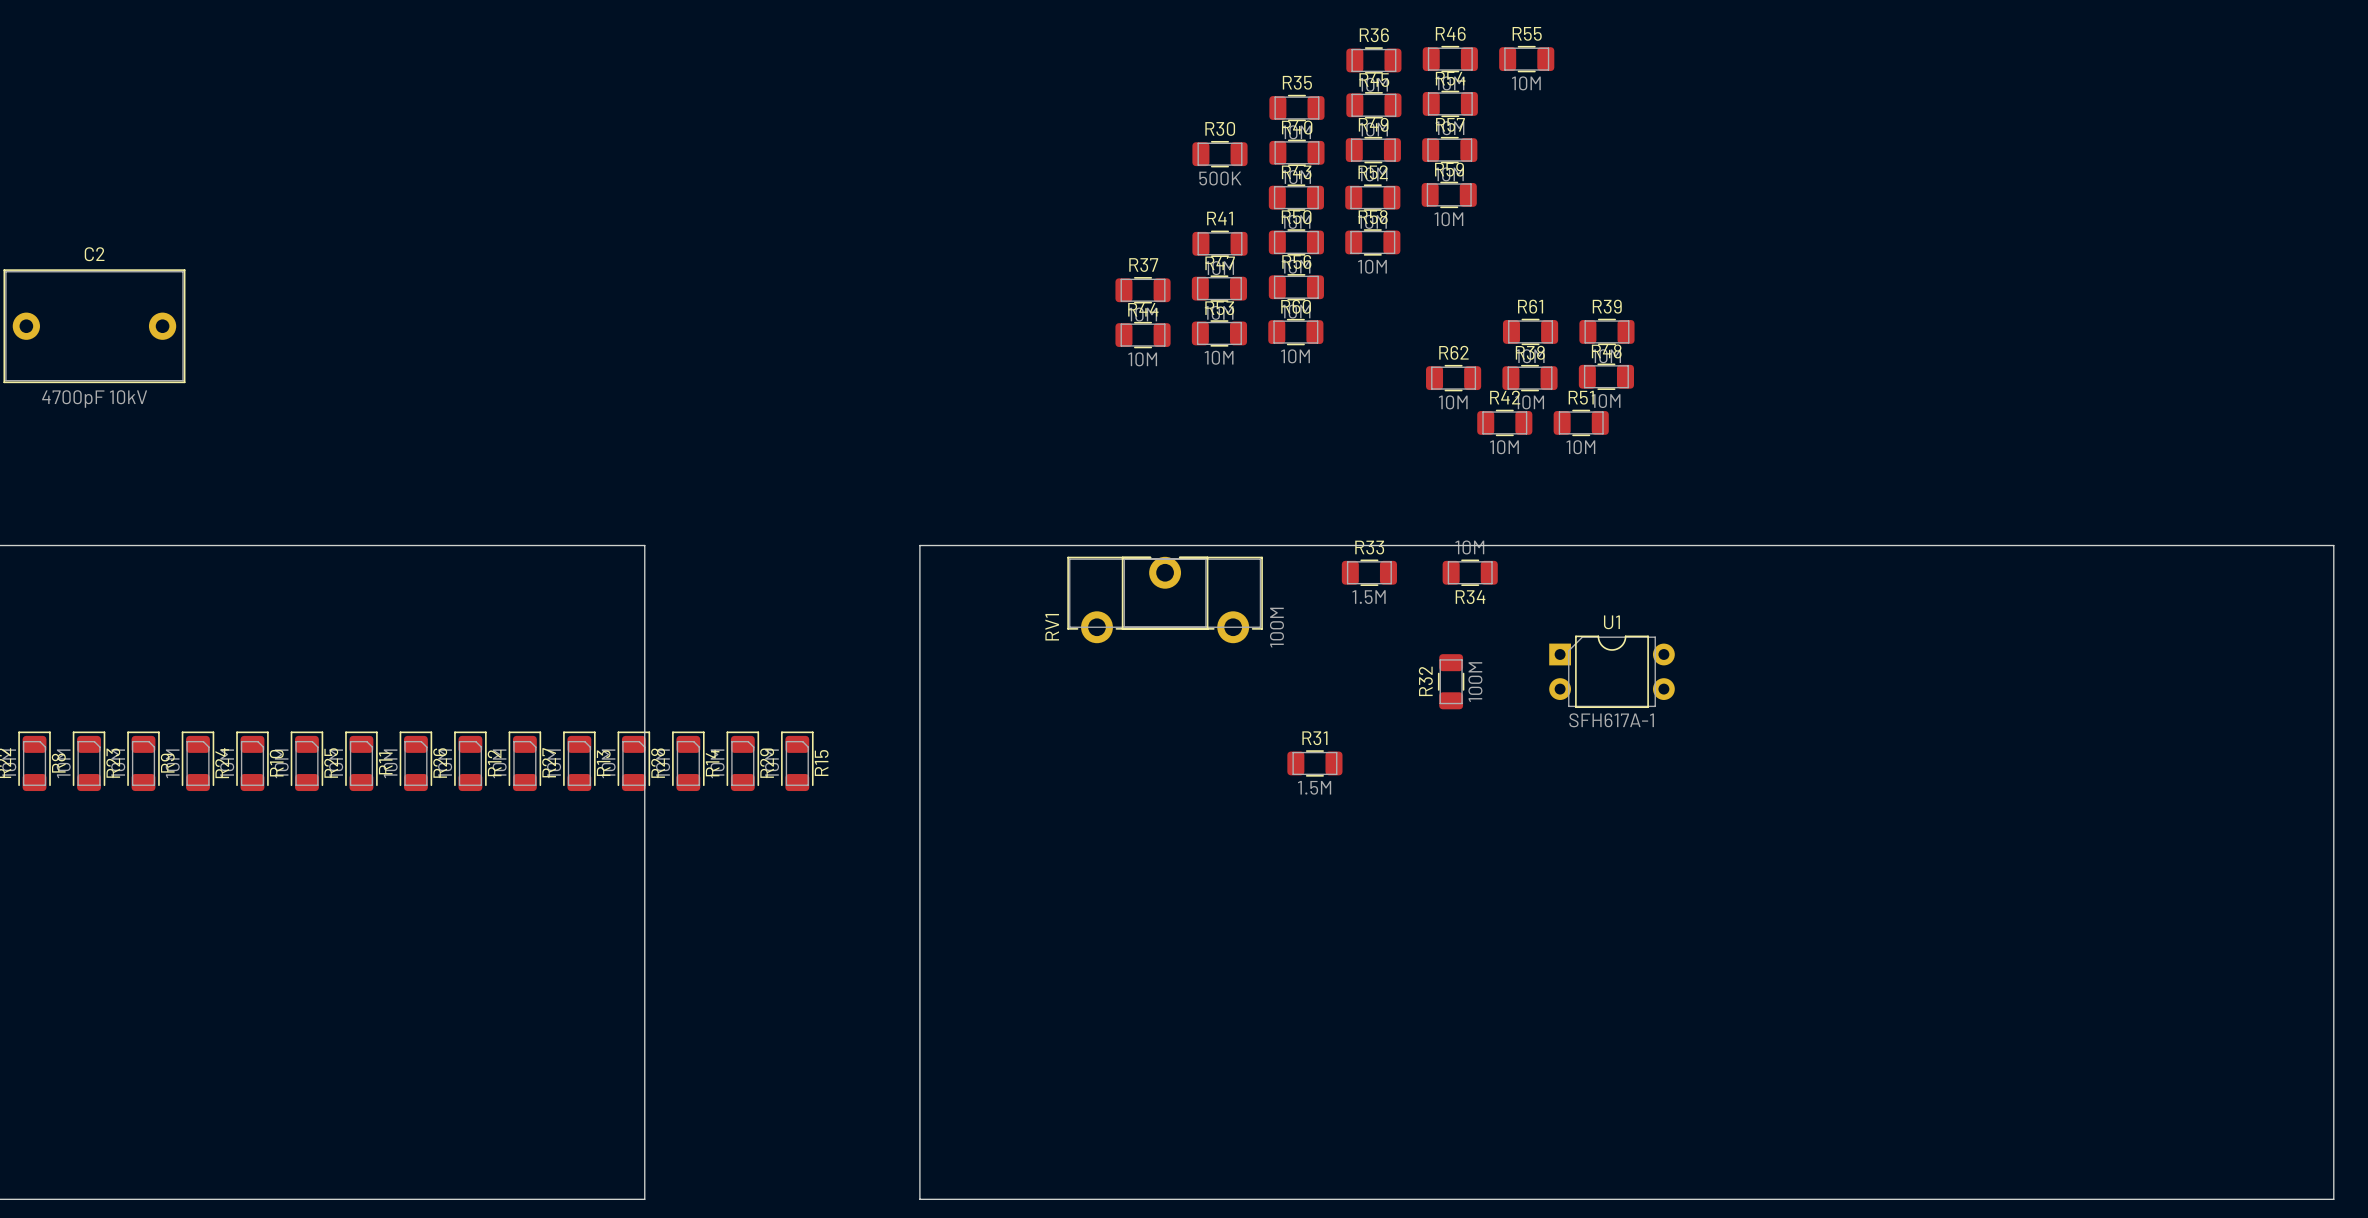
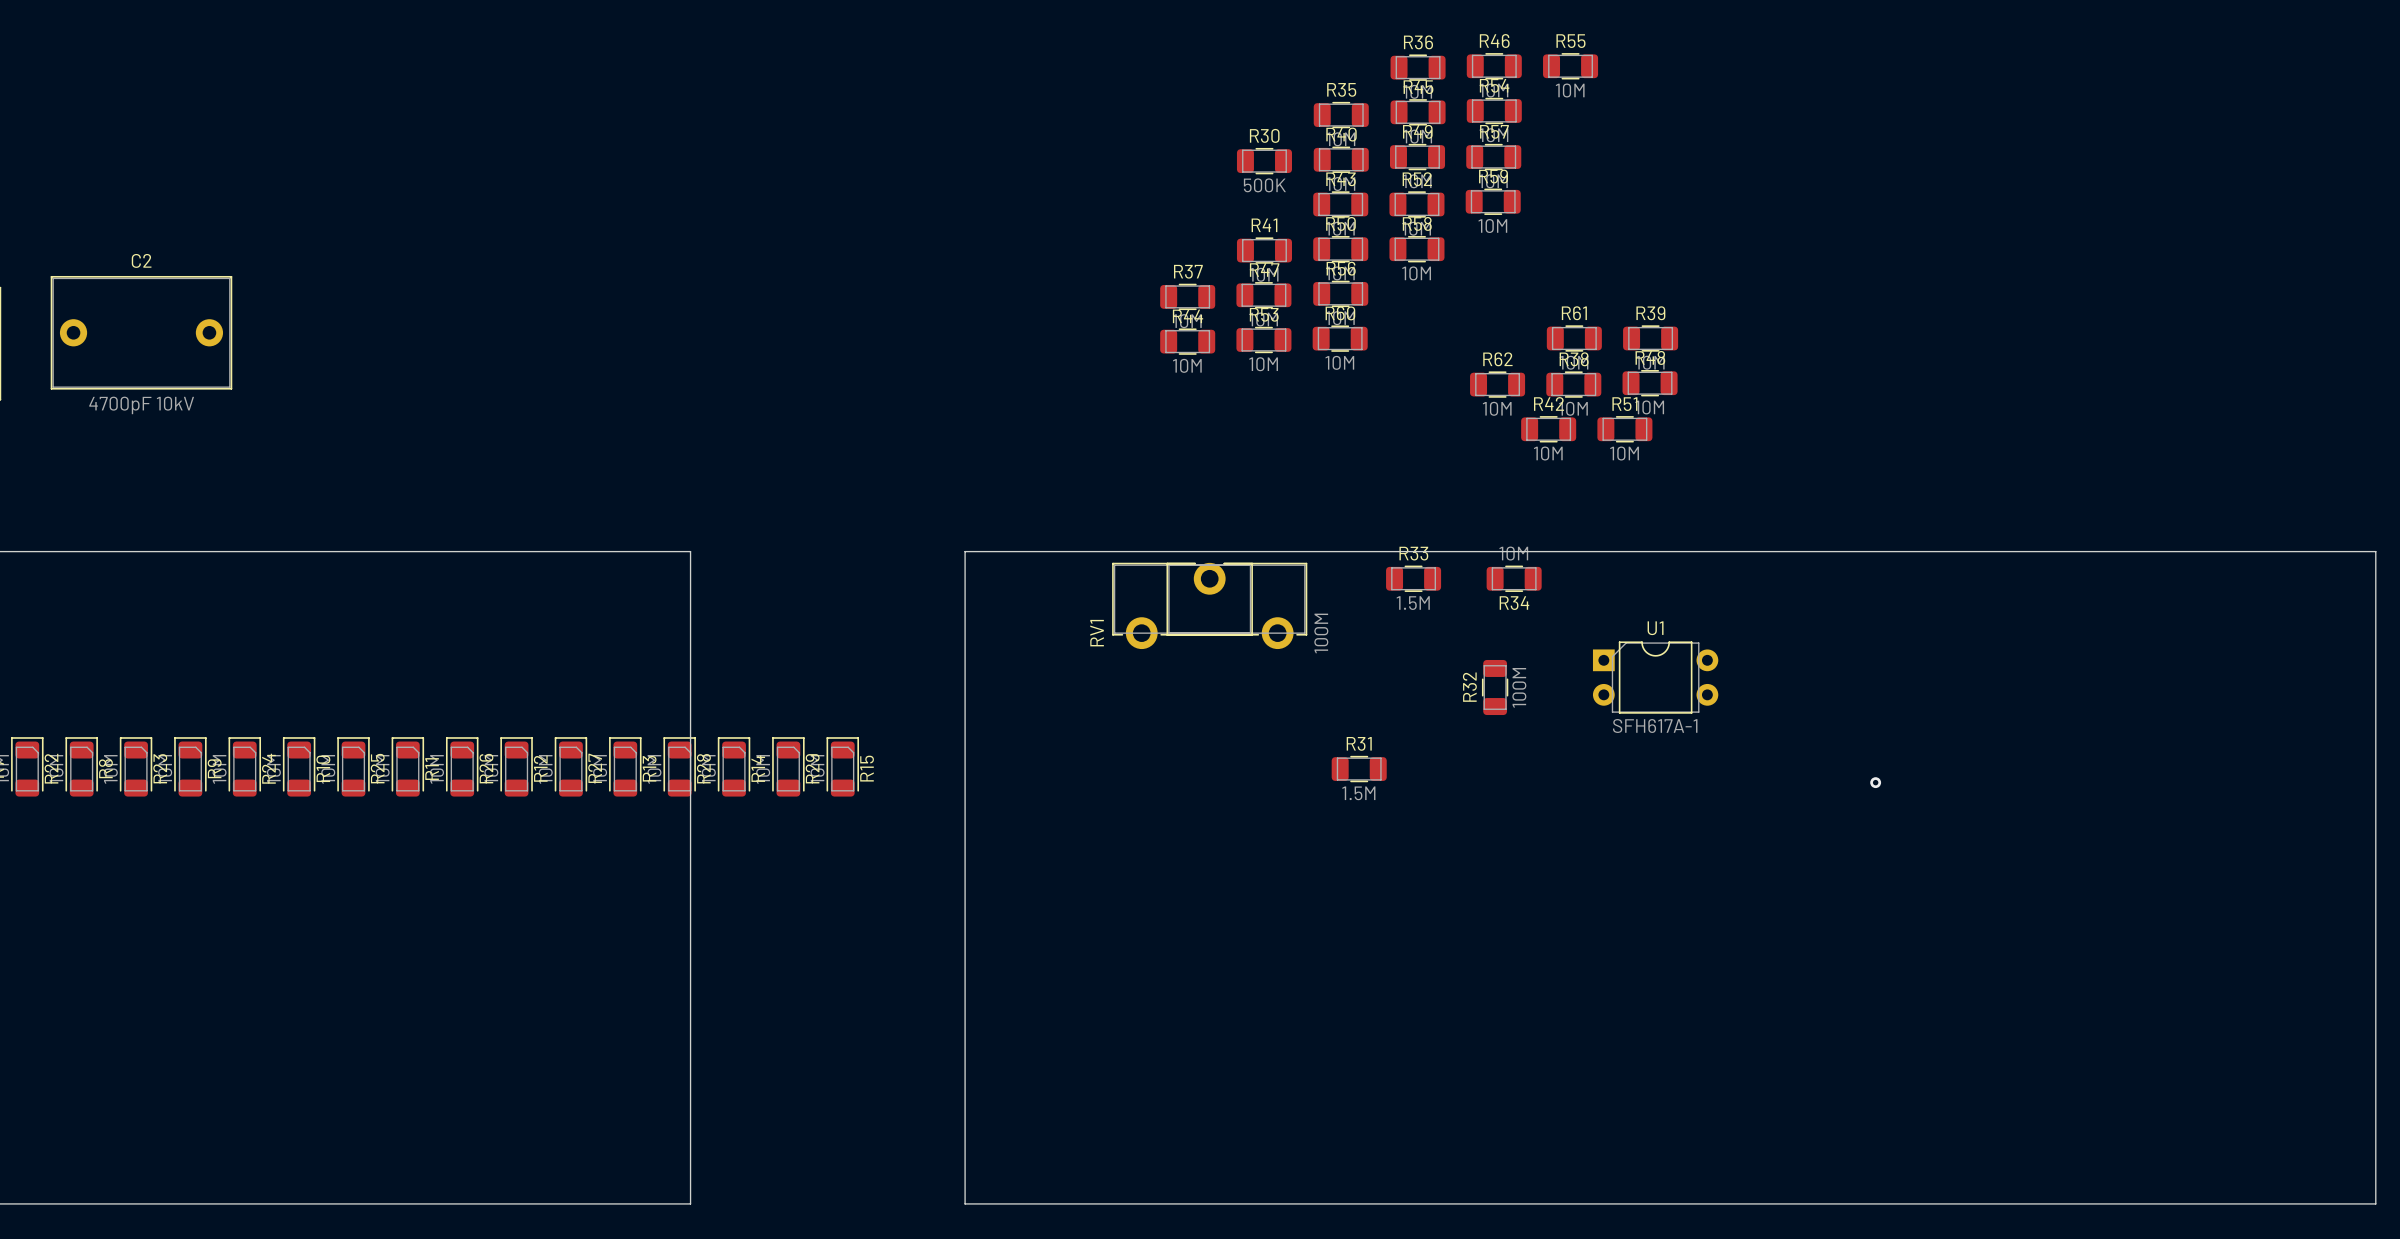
via: none -> (1875, 782)

